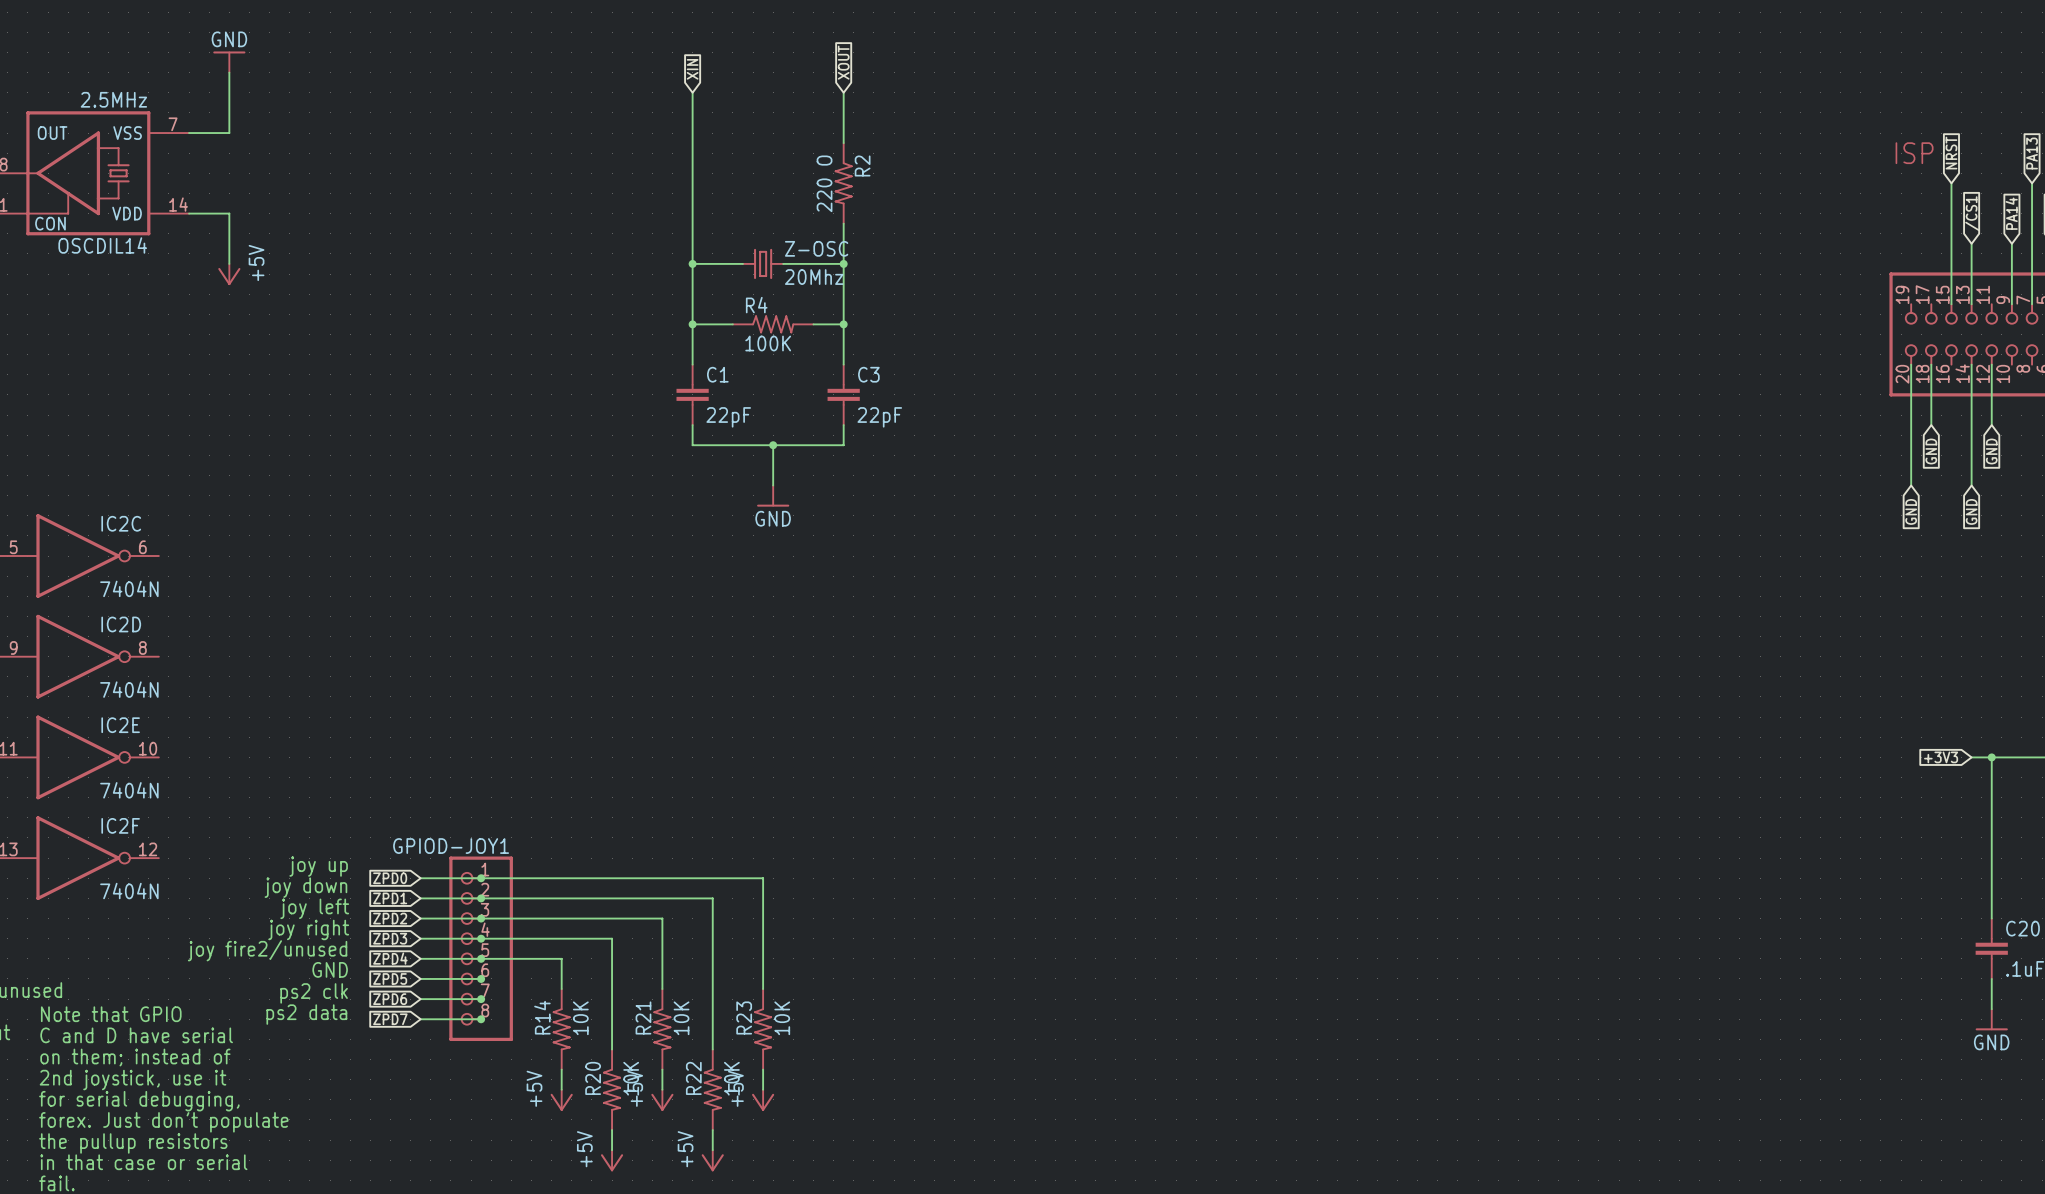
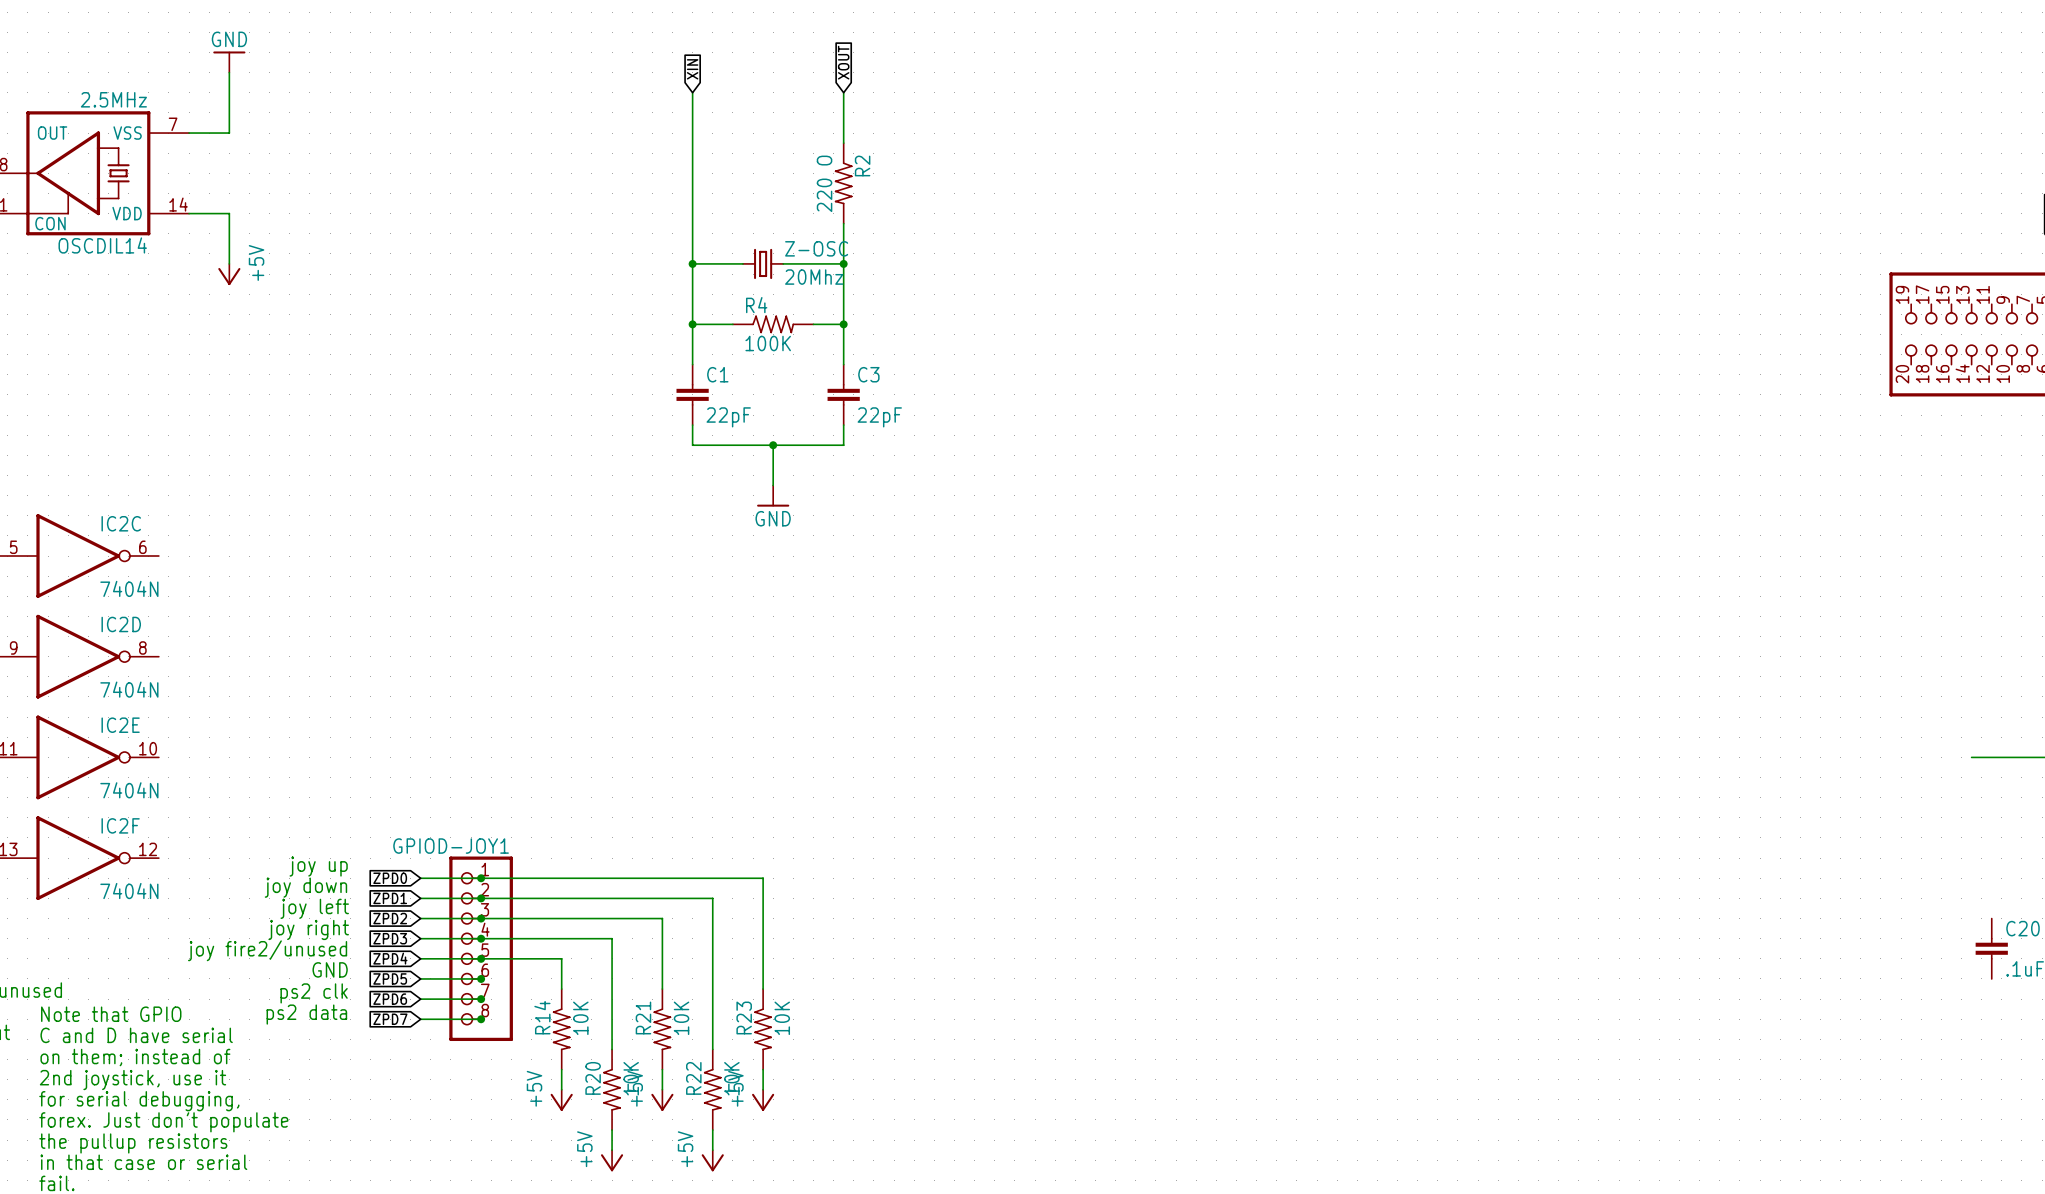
text: ISP (1914, 153) -> none
global label: NRST (1951, 153) -> none
global label: PA13 (2032, 153) -> none
wire: (1951, 183) (1951, 304) -> none
wire: (2032, 183) (2032, 304) -> none
global label: /CS1 (1972, 213) -> none
global label: PA14 (2011, 213) -> none
wire: (1971, 243) (1971, 304) -> none
wire: (2011, 243) (2011, 304) -> none
wire: (1911, 364) (1911, 485) -> none
wire: (1931, 364) (1931, 425) -> none
wire: (1971, 364) (1971, 485) -> none
wire: (1991, 364) (1991, 425) -> none
global label: GND (1931, 451) -> none
global label: GND (1991, 451) -> none
global label: GND (1911, 511) -> none
global label: GND (1971, 511) -> none
global label: +3V3 (1941, 757) -> none
wire: (1991, 757) (1991, 918) -> none
junction: (1991, 757) -> none
wire: (1991, 978) (1991, 1009) -> none
power symbol: GND (1991, 1019) -> none

